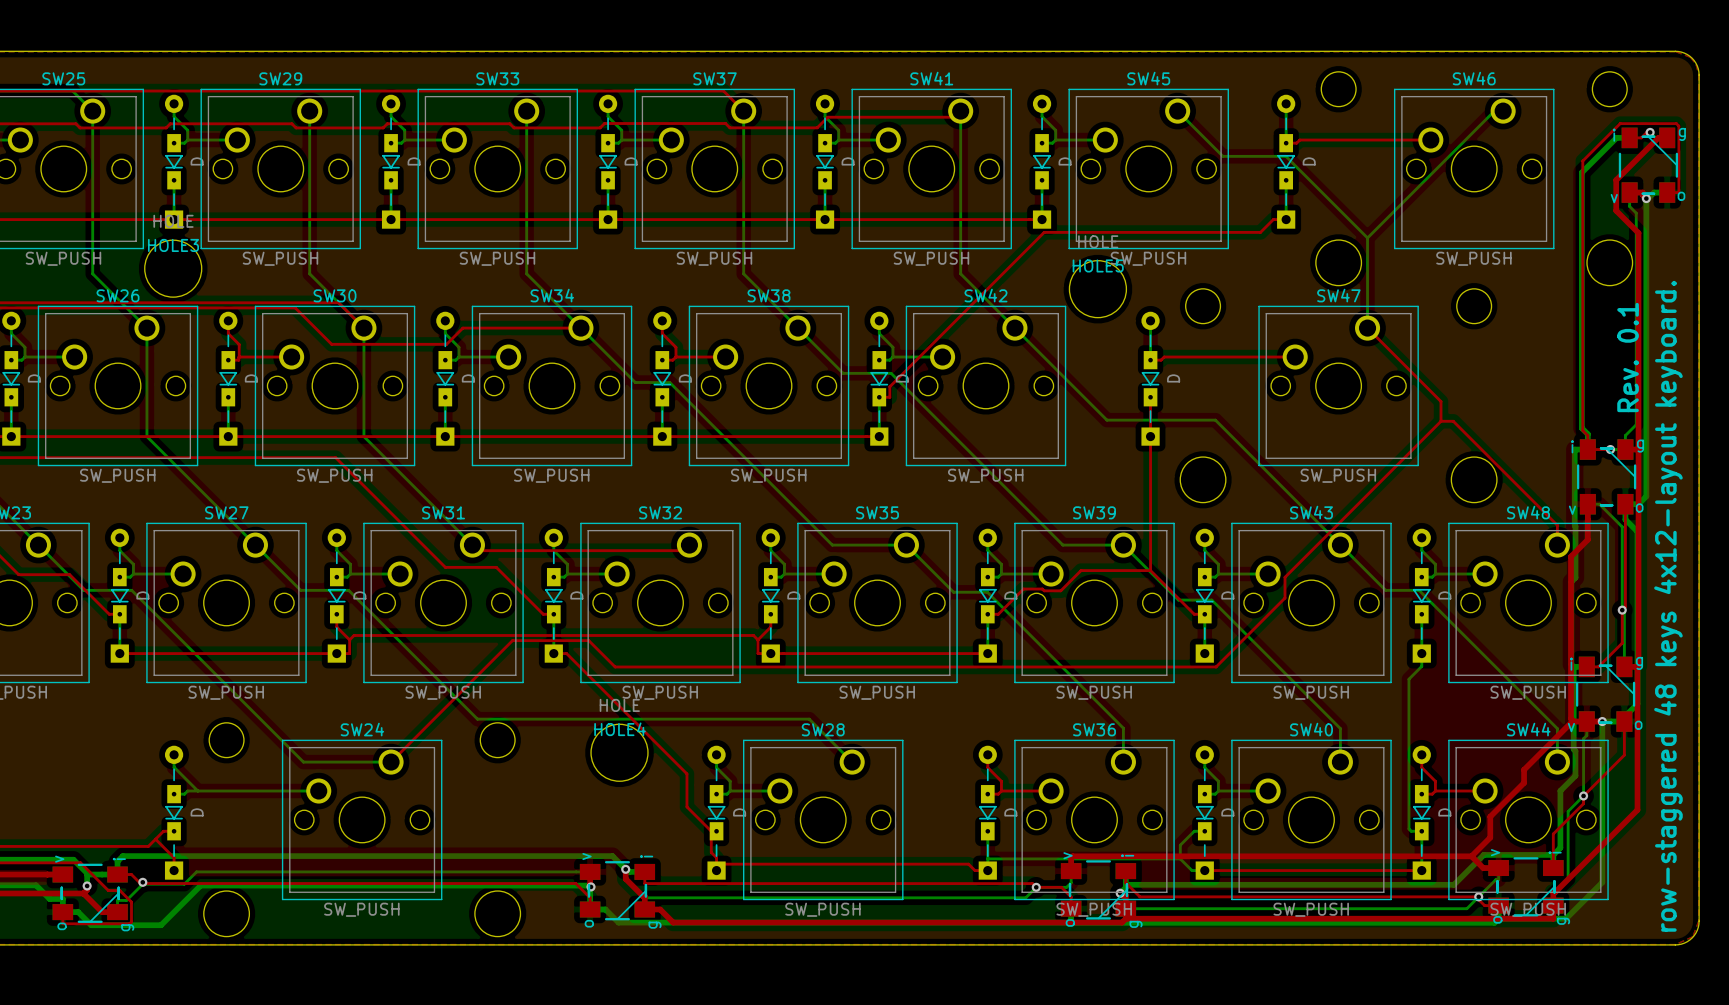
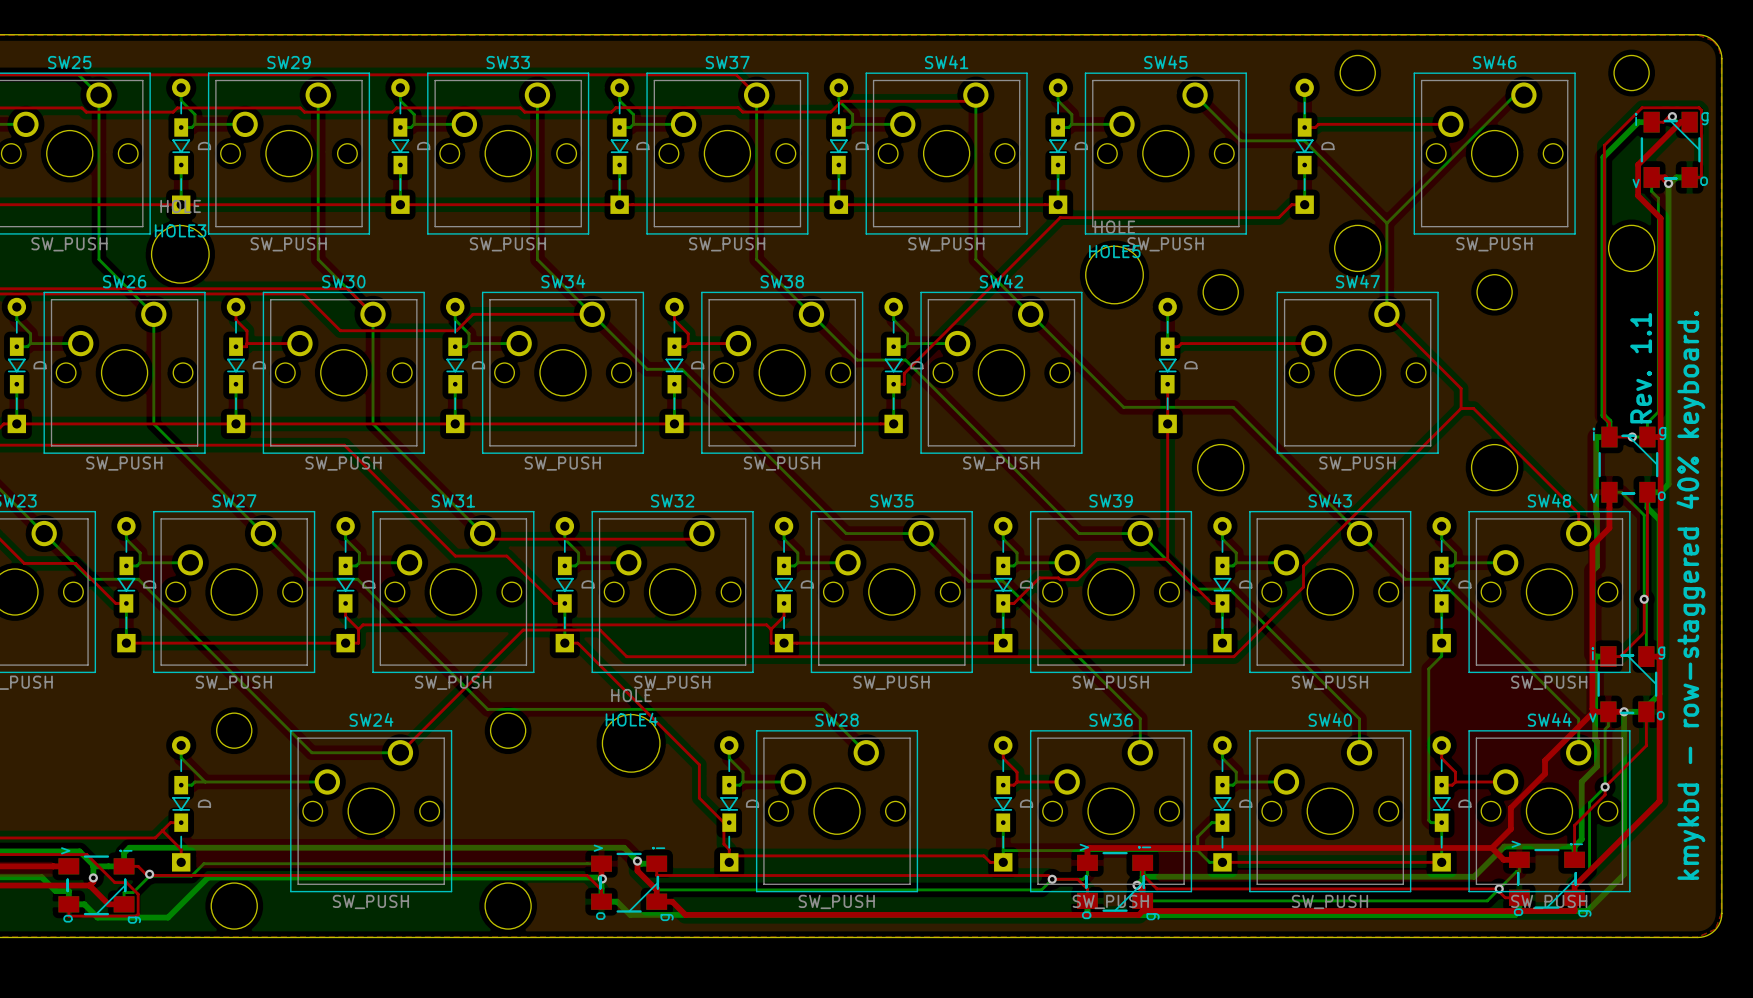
text: Rev. 0.1 (1628, 357) -> Rev. 1.1 (1641, 368)
text: row-staggered 48 keys 4x12-layout keyboard. (1668, 606) -> kmykbd - row-staggered 40% keyboard. (1690, 595)

